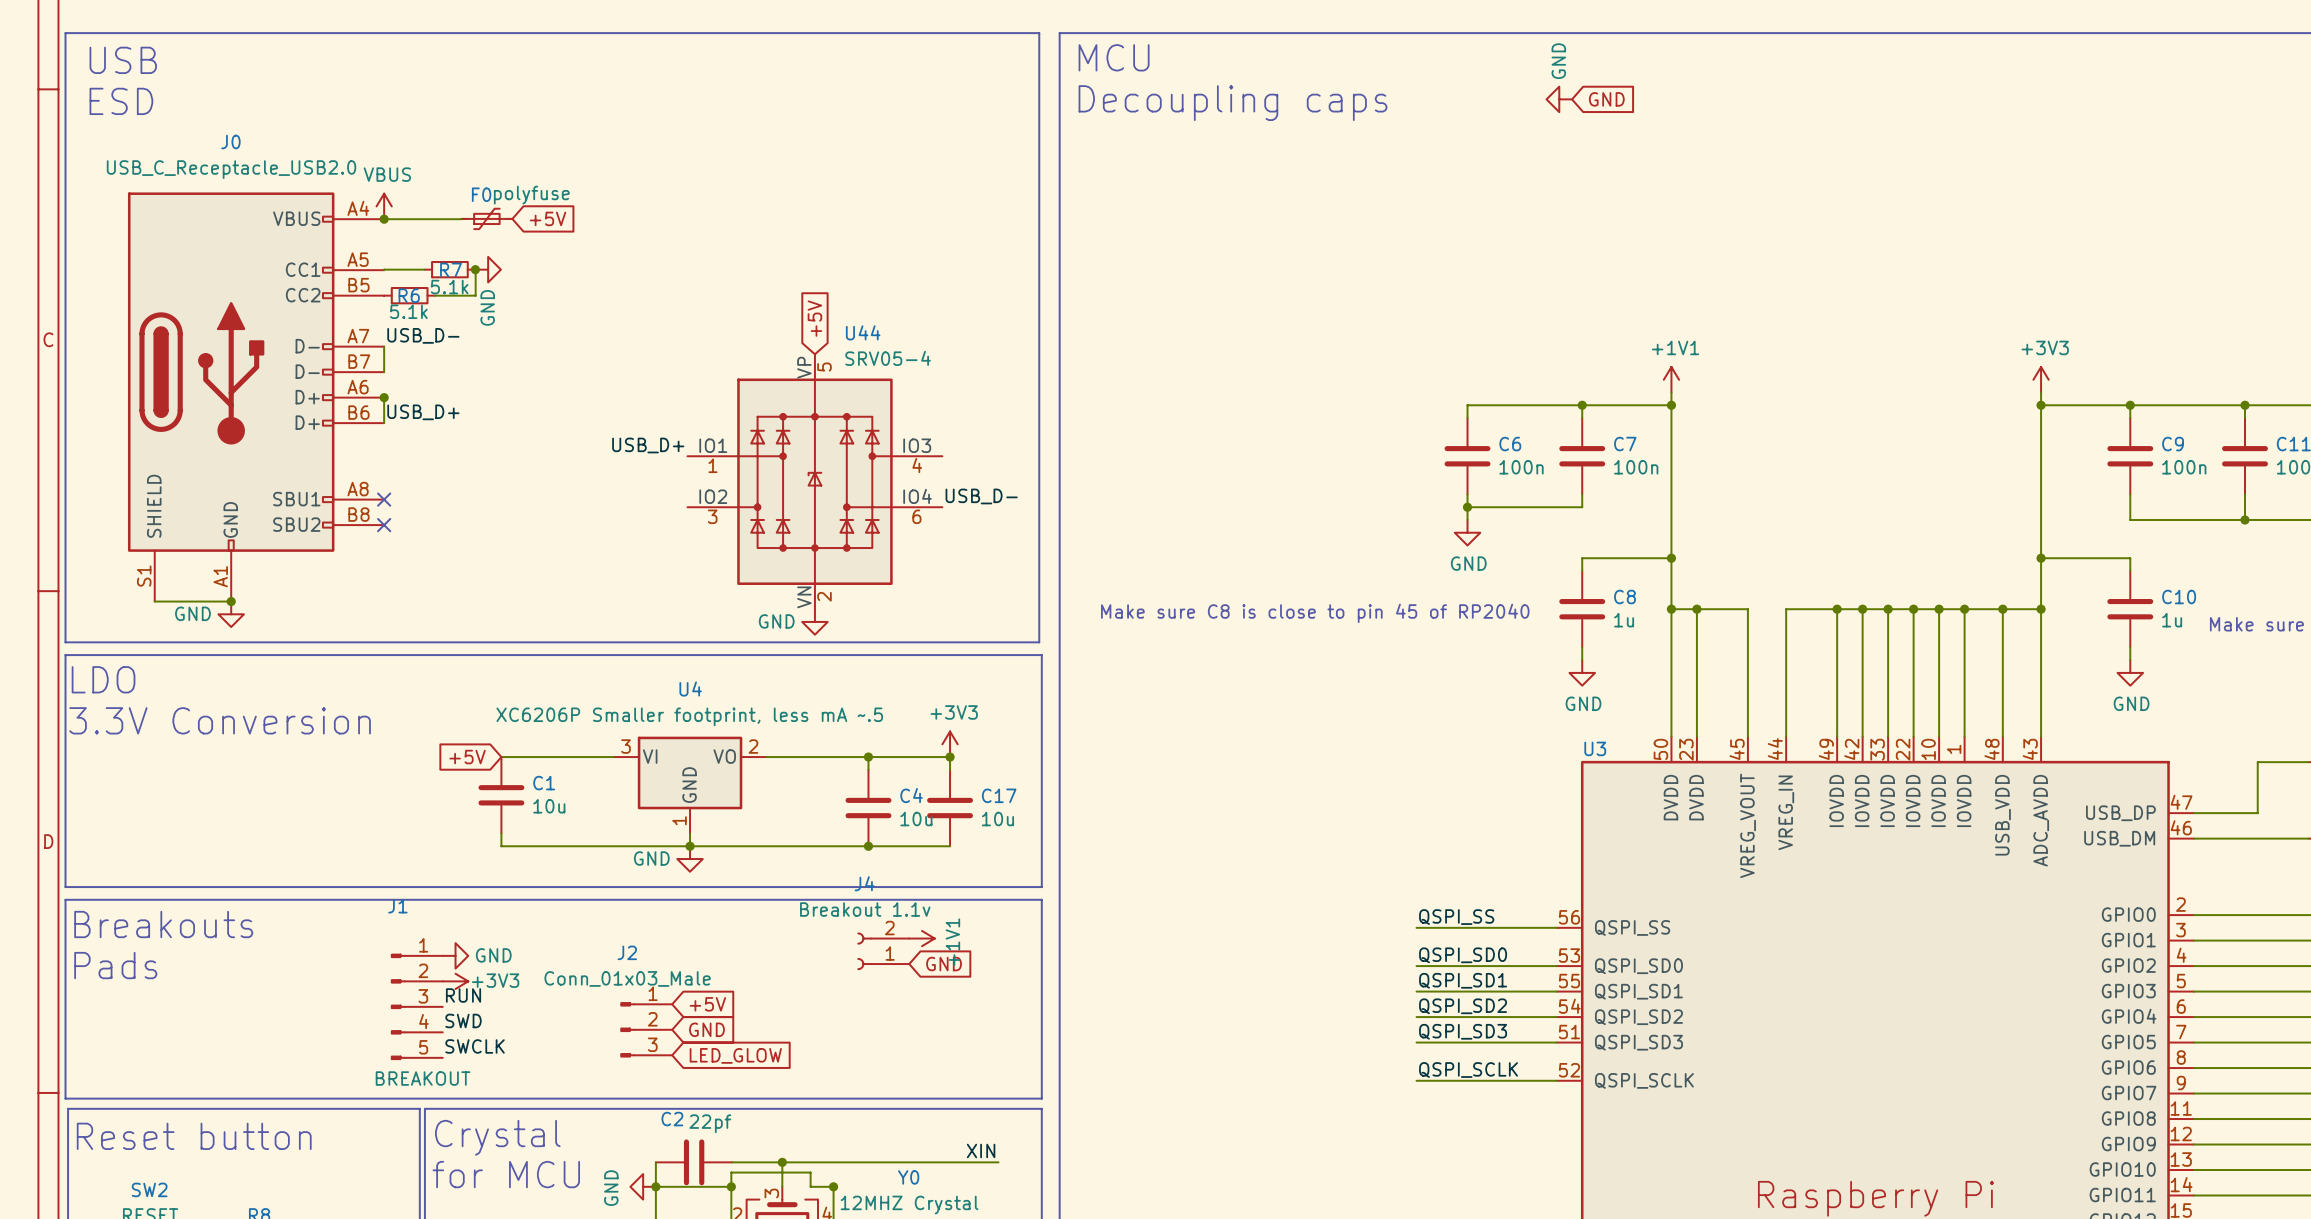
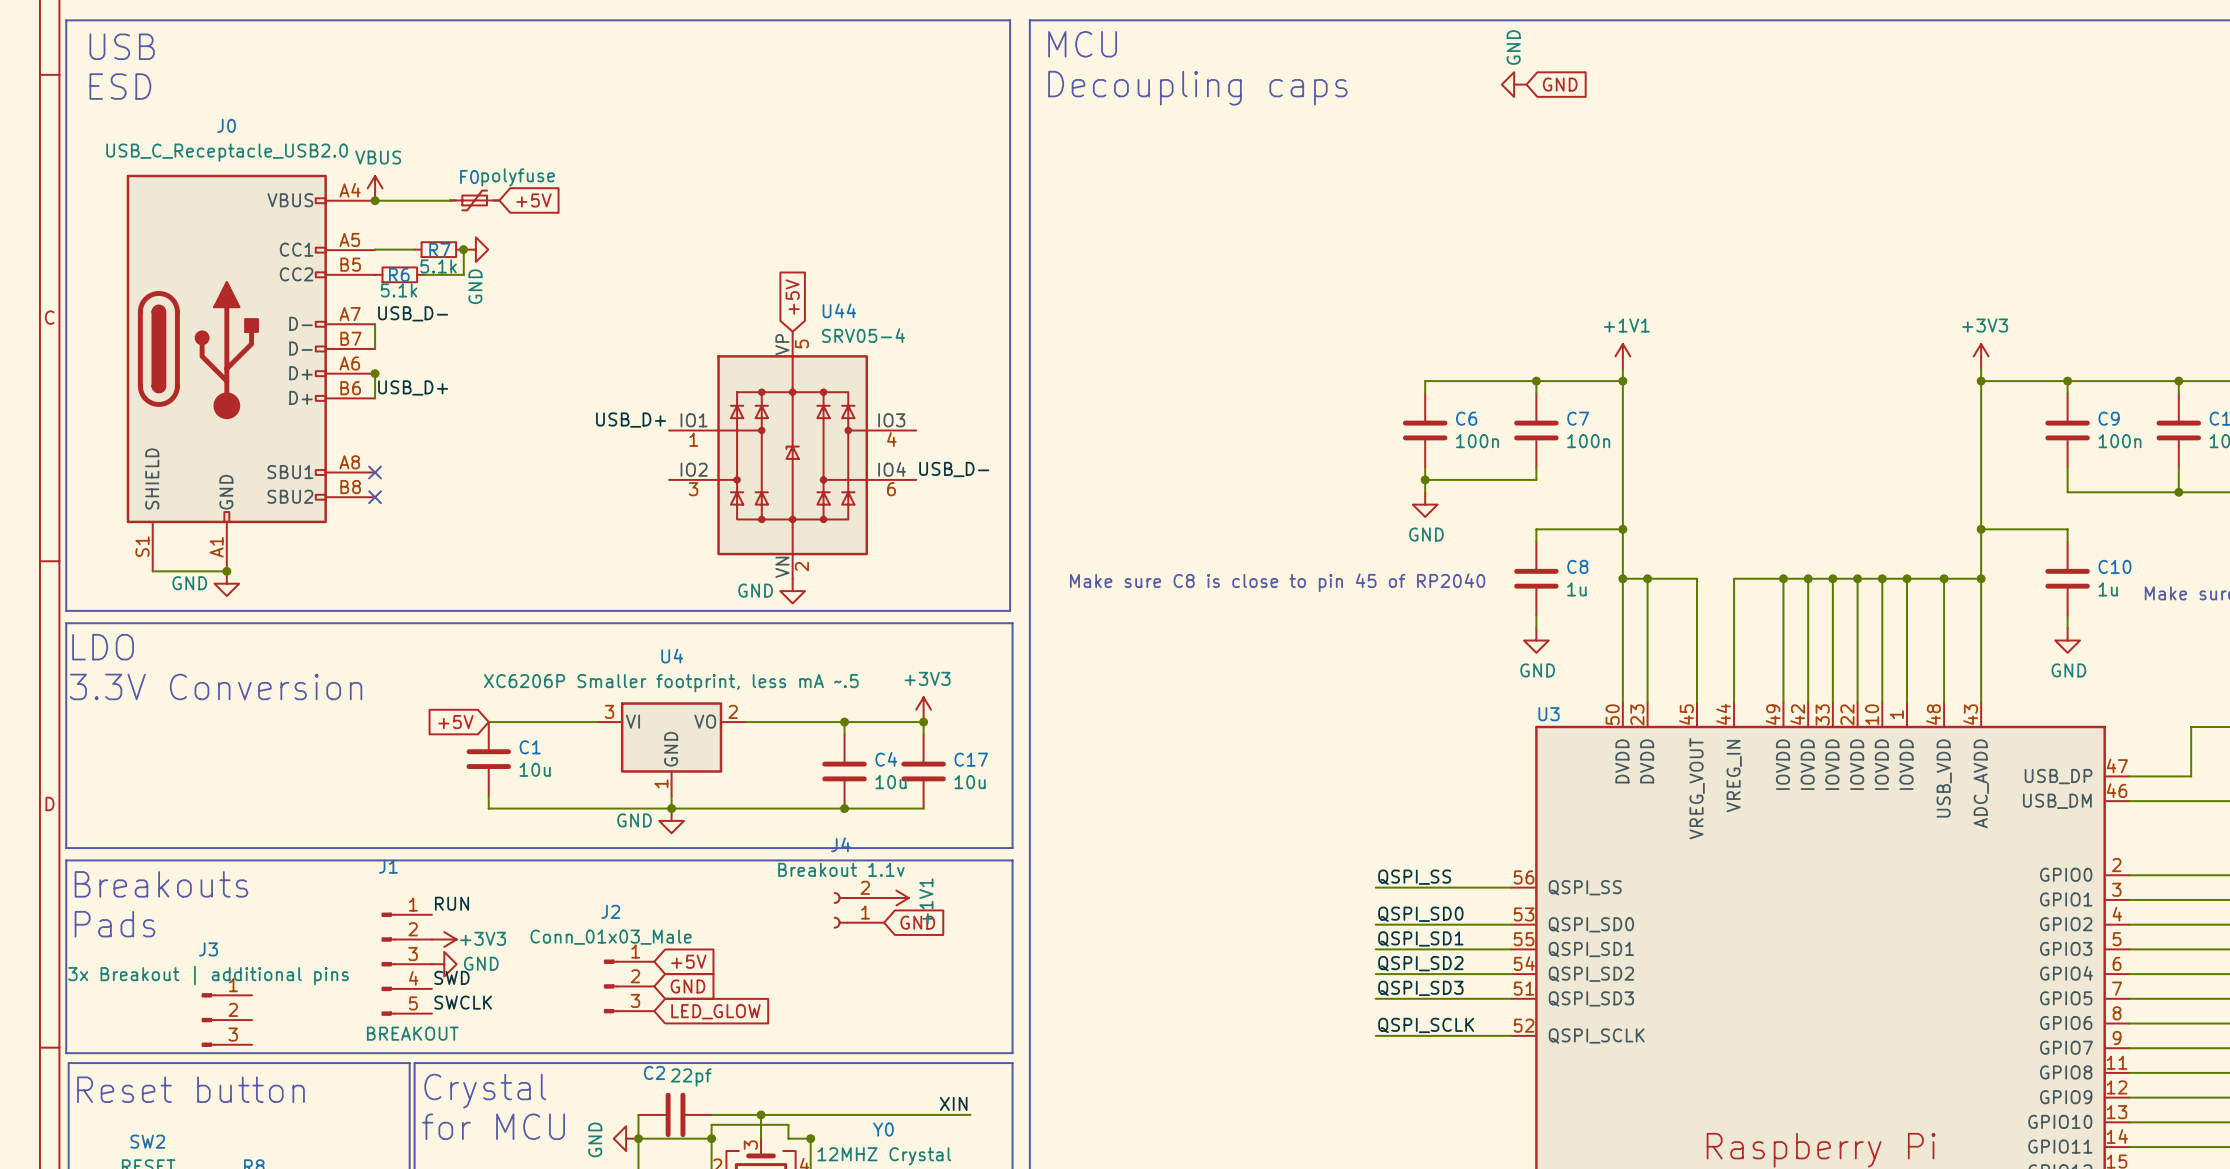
power symbol position: GND (455, 955) -> GND (444, 964)
label position: RUN (463, 995) -> RUN (452, 903)
J3: none -> 3x Breakout | additional pins (226, 1020)

